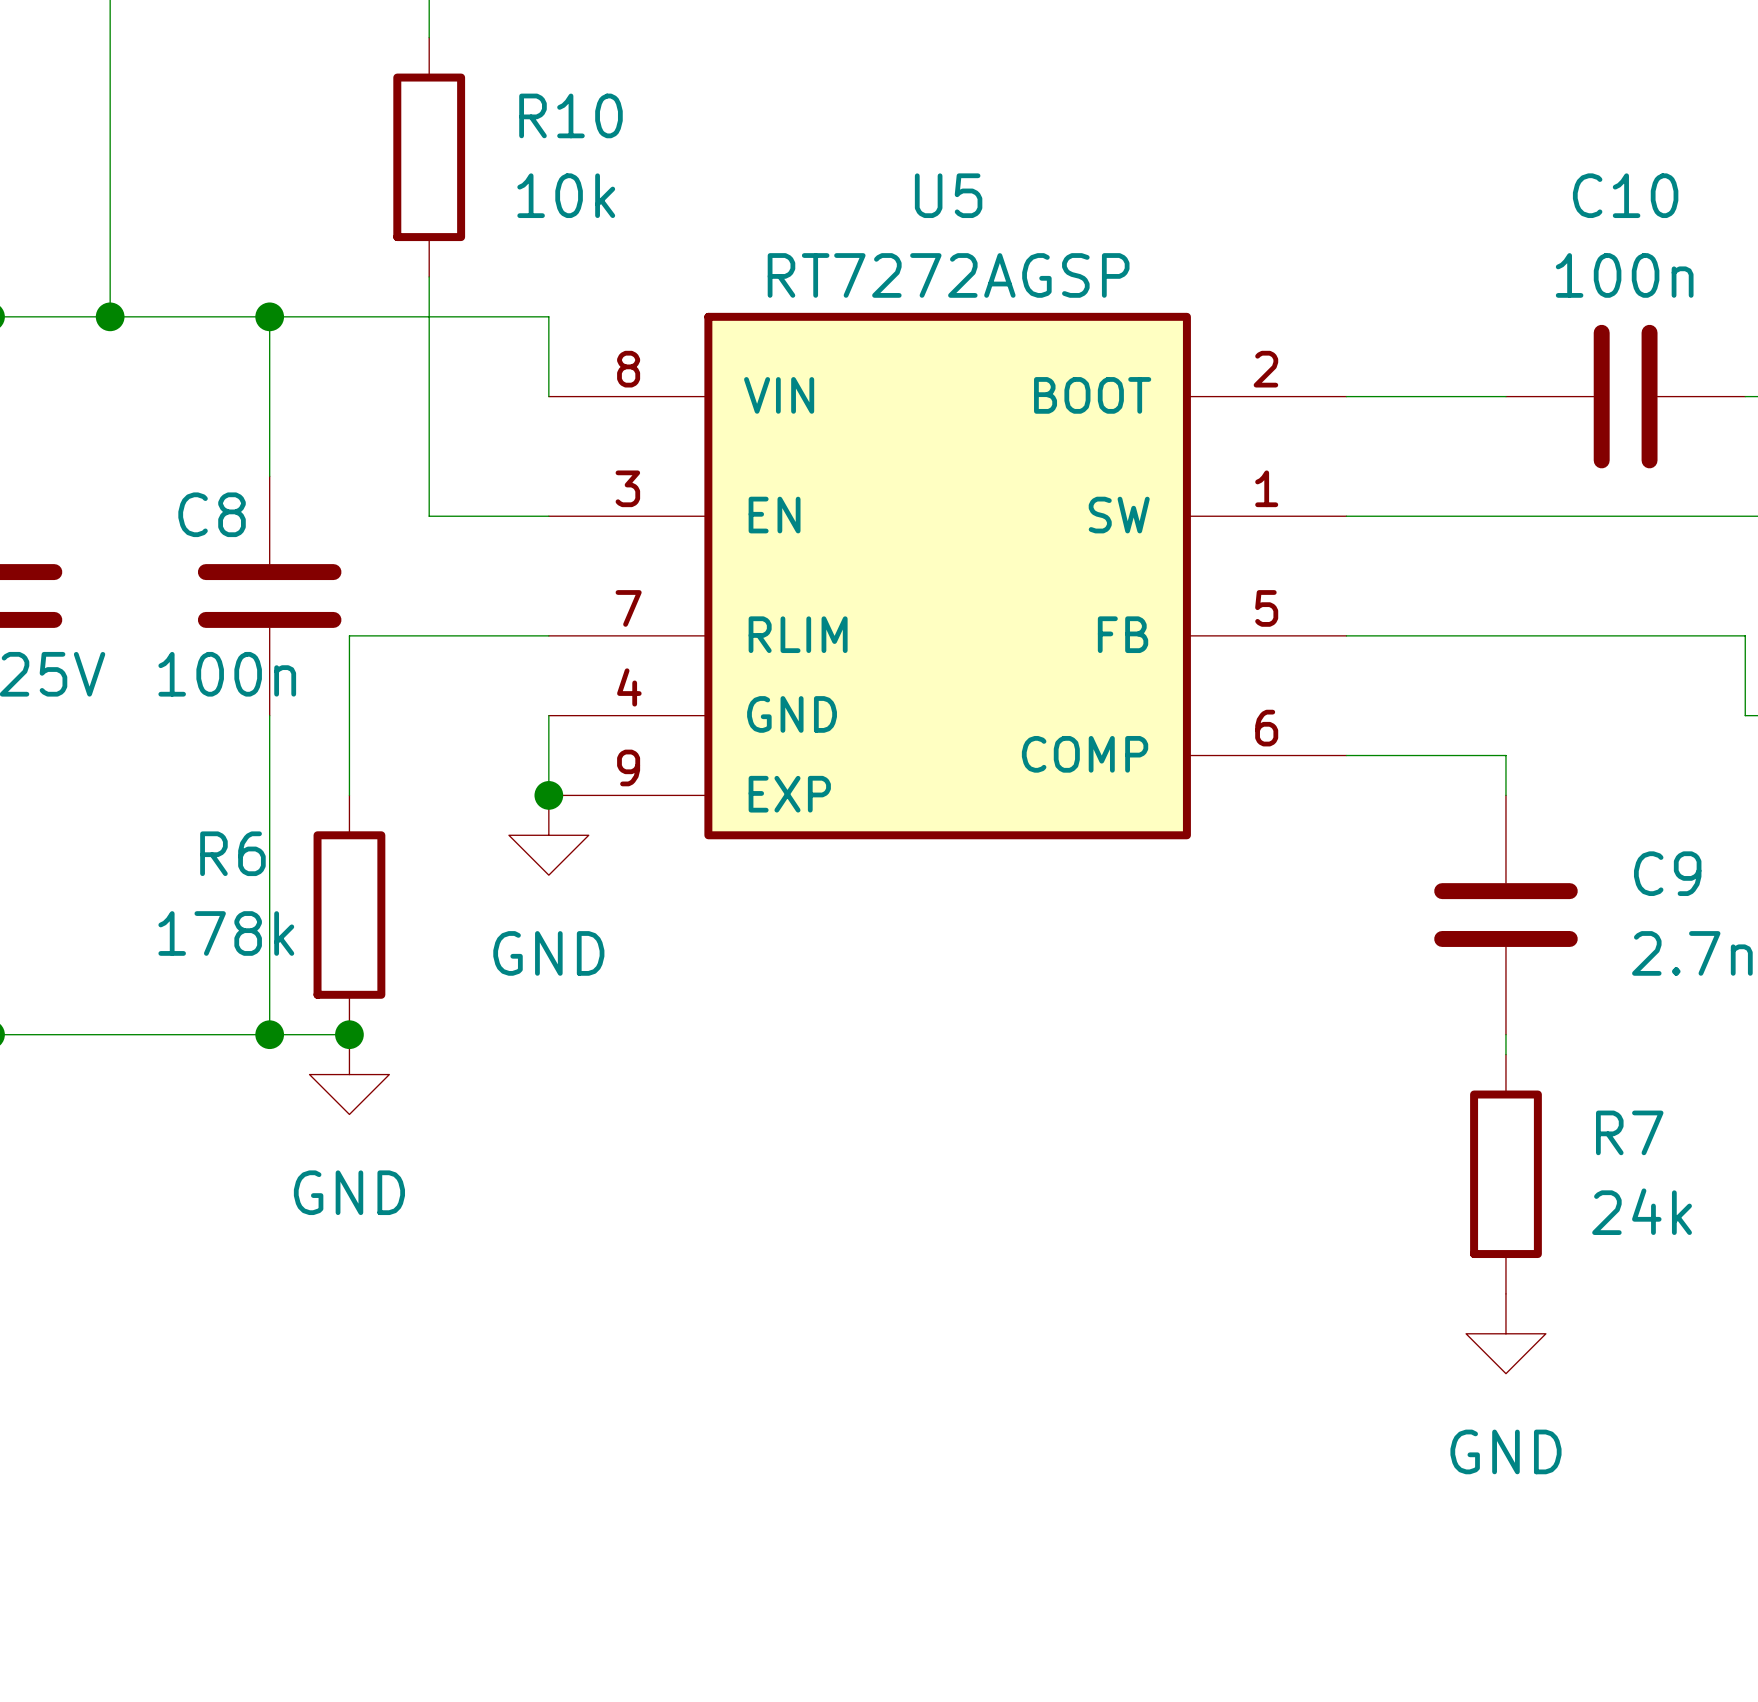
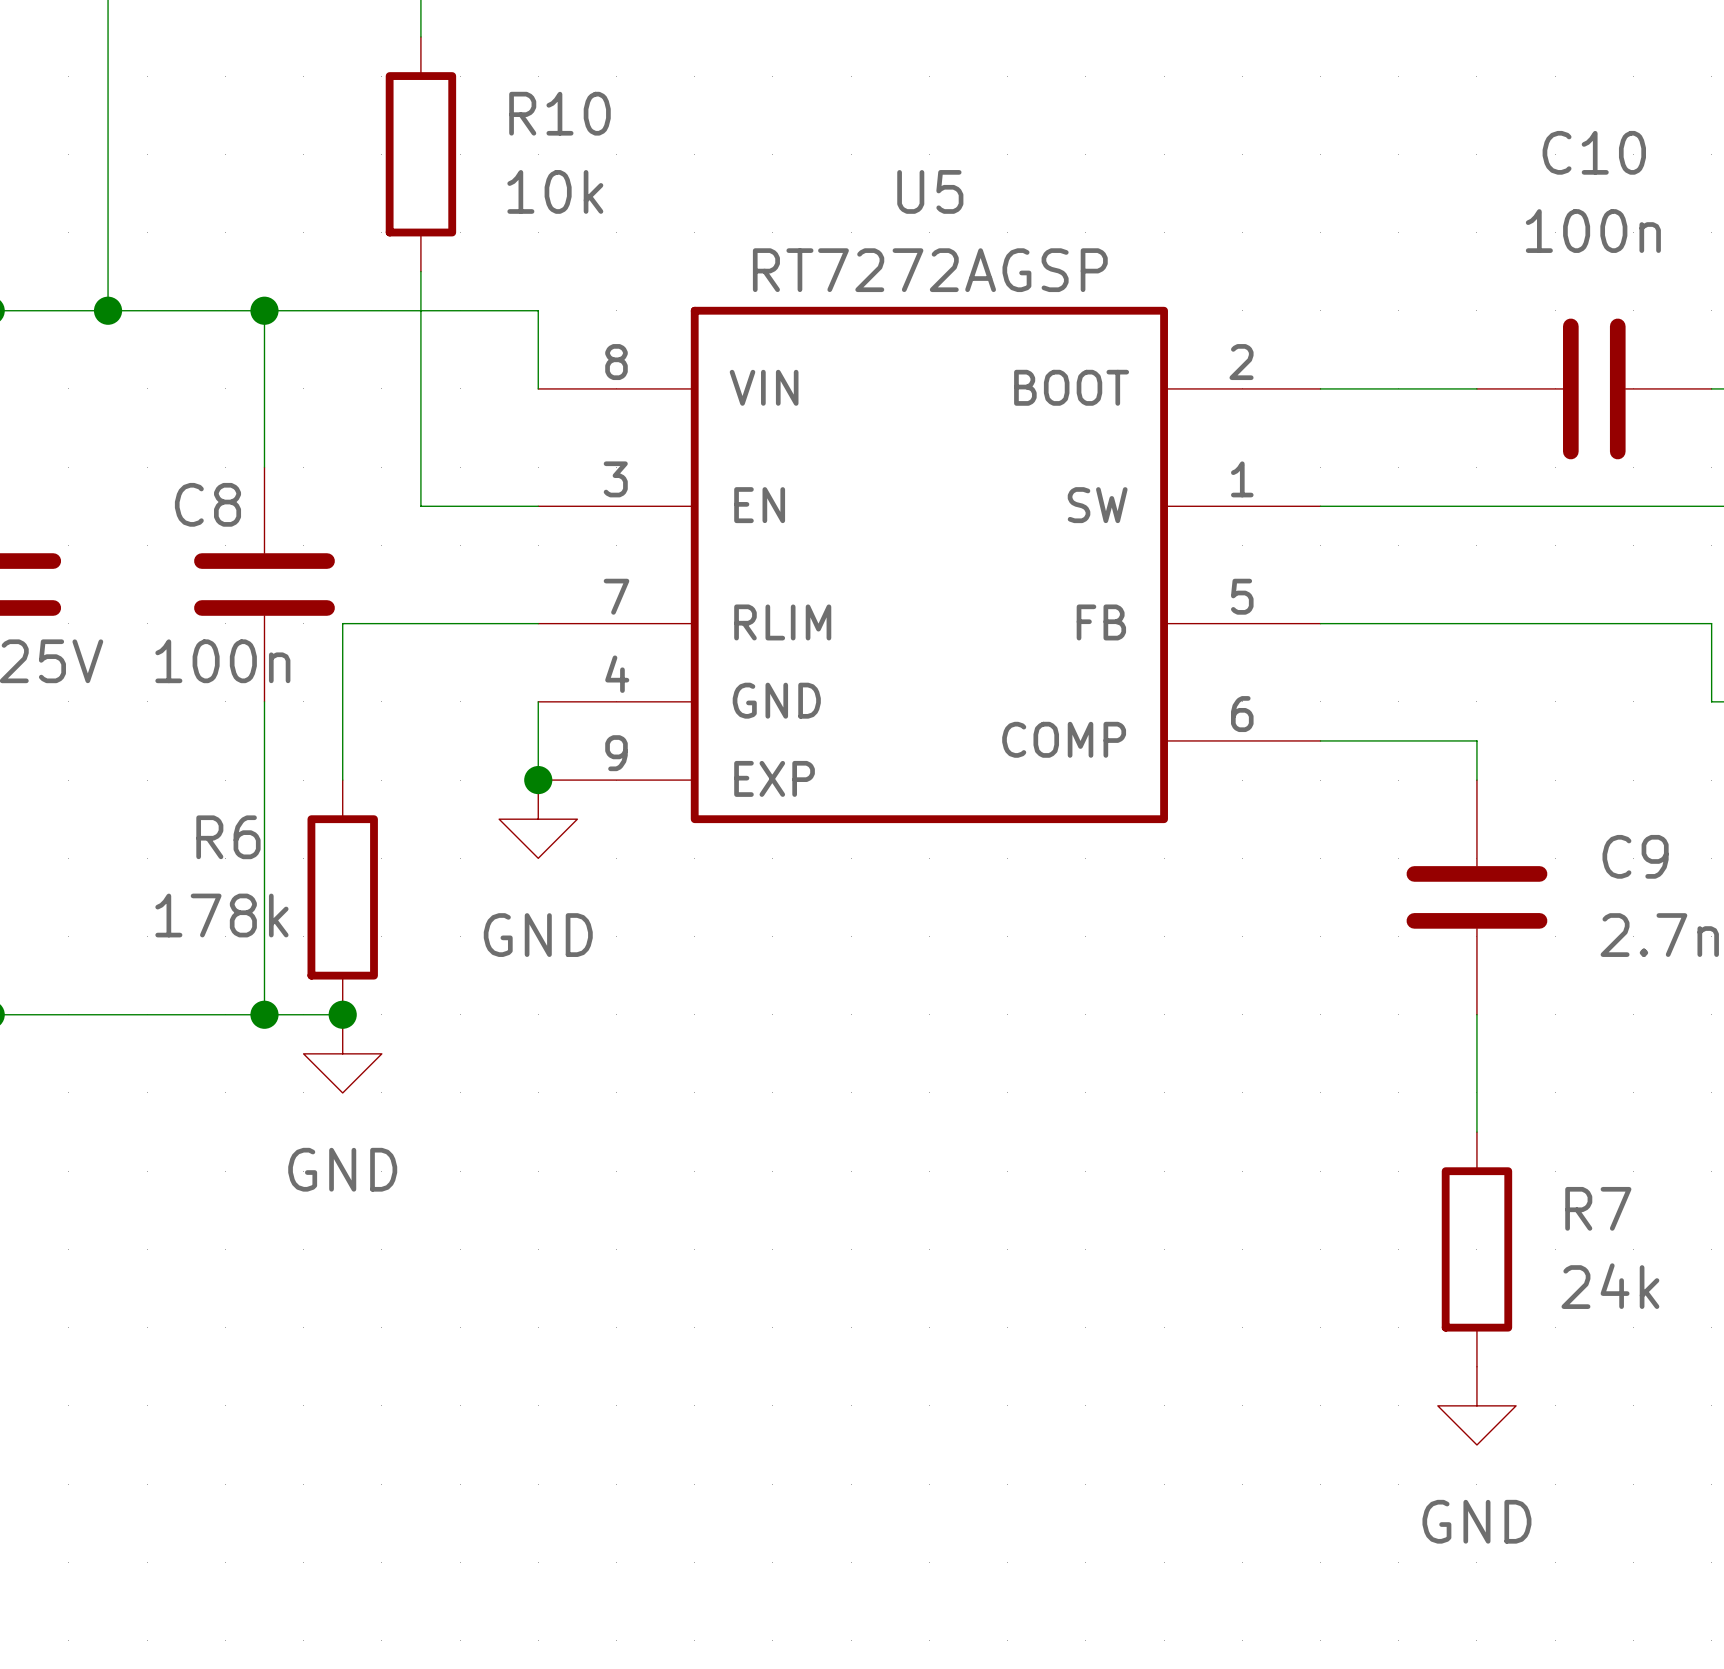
C10 name position: C10 (1625, 195) -> C10 (1594, 152)
C10 value position: 100n (1624, 275) -> 100n (1593, 231)
wire: none -> (1476, 1034) (1476, 1132)
R7 position: (1505, 1174) -> (1476, 1249)
power symbol position: GND (1505, 1333) -> GND (1476, 1405)

